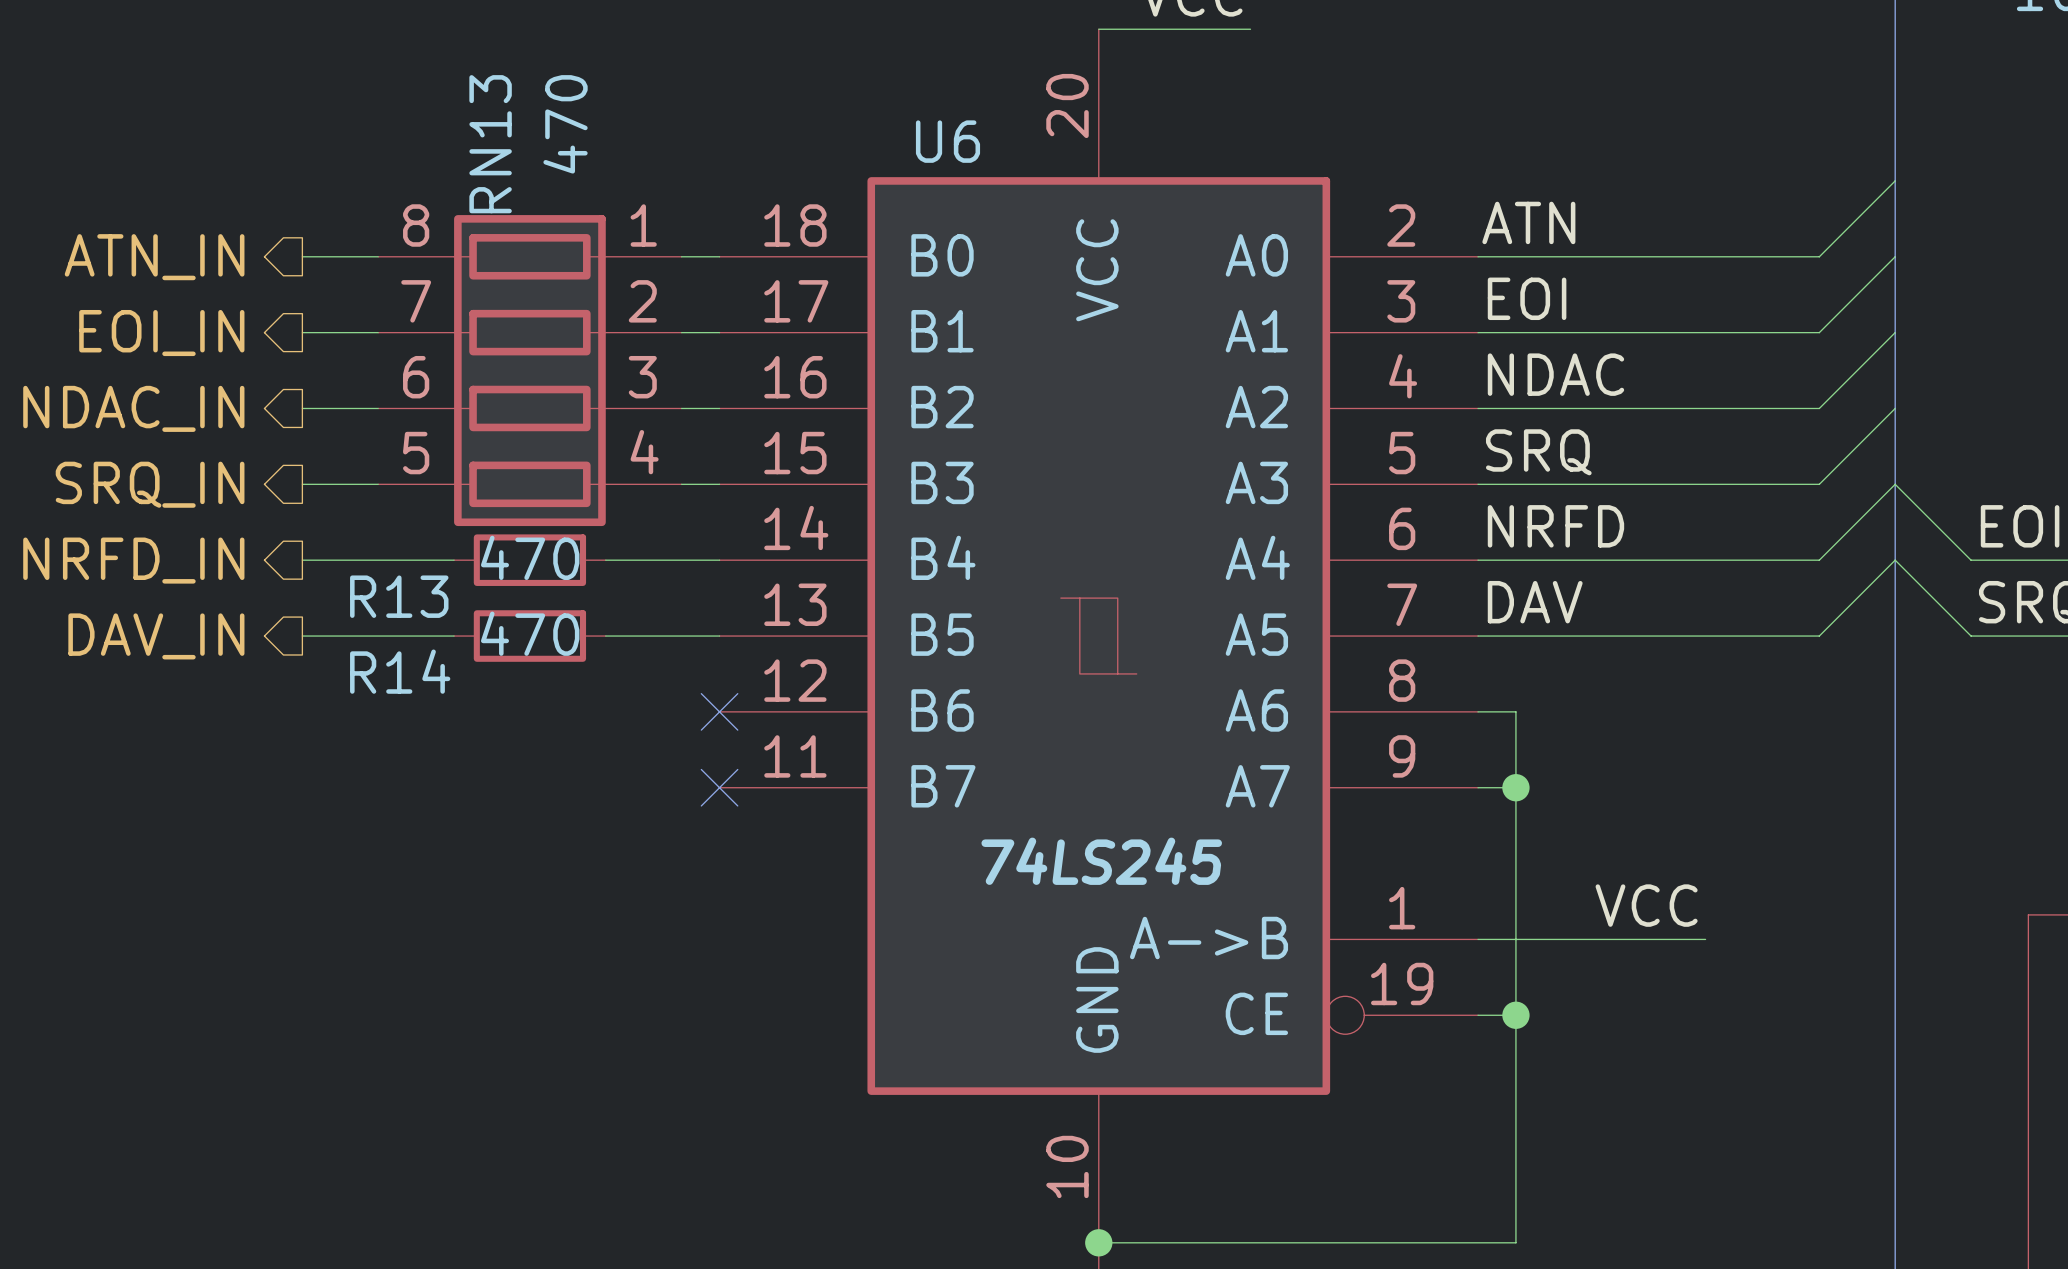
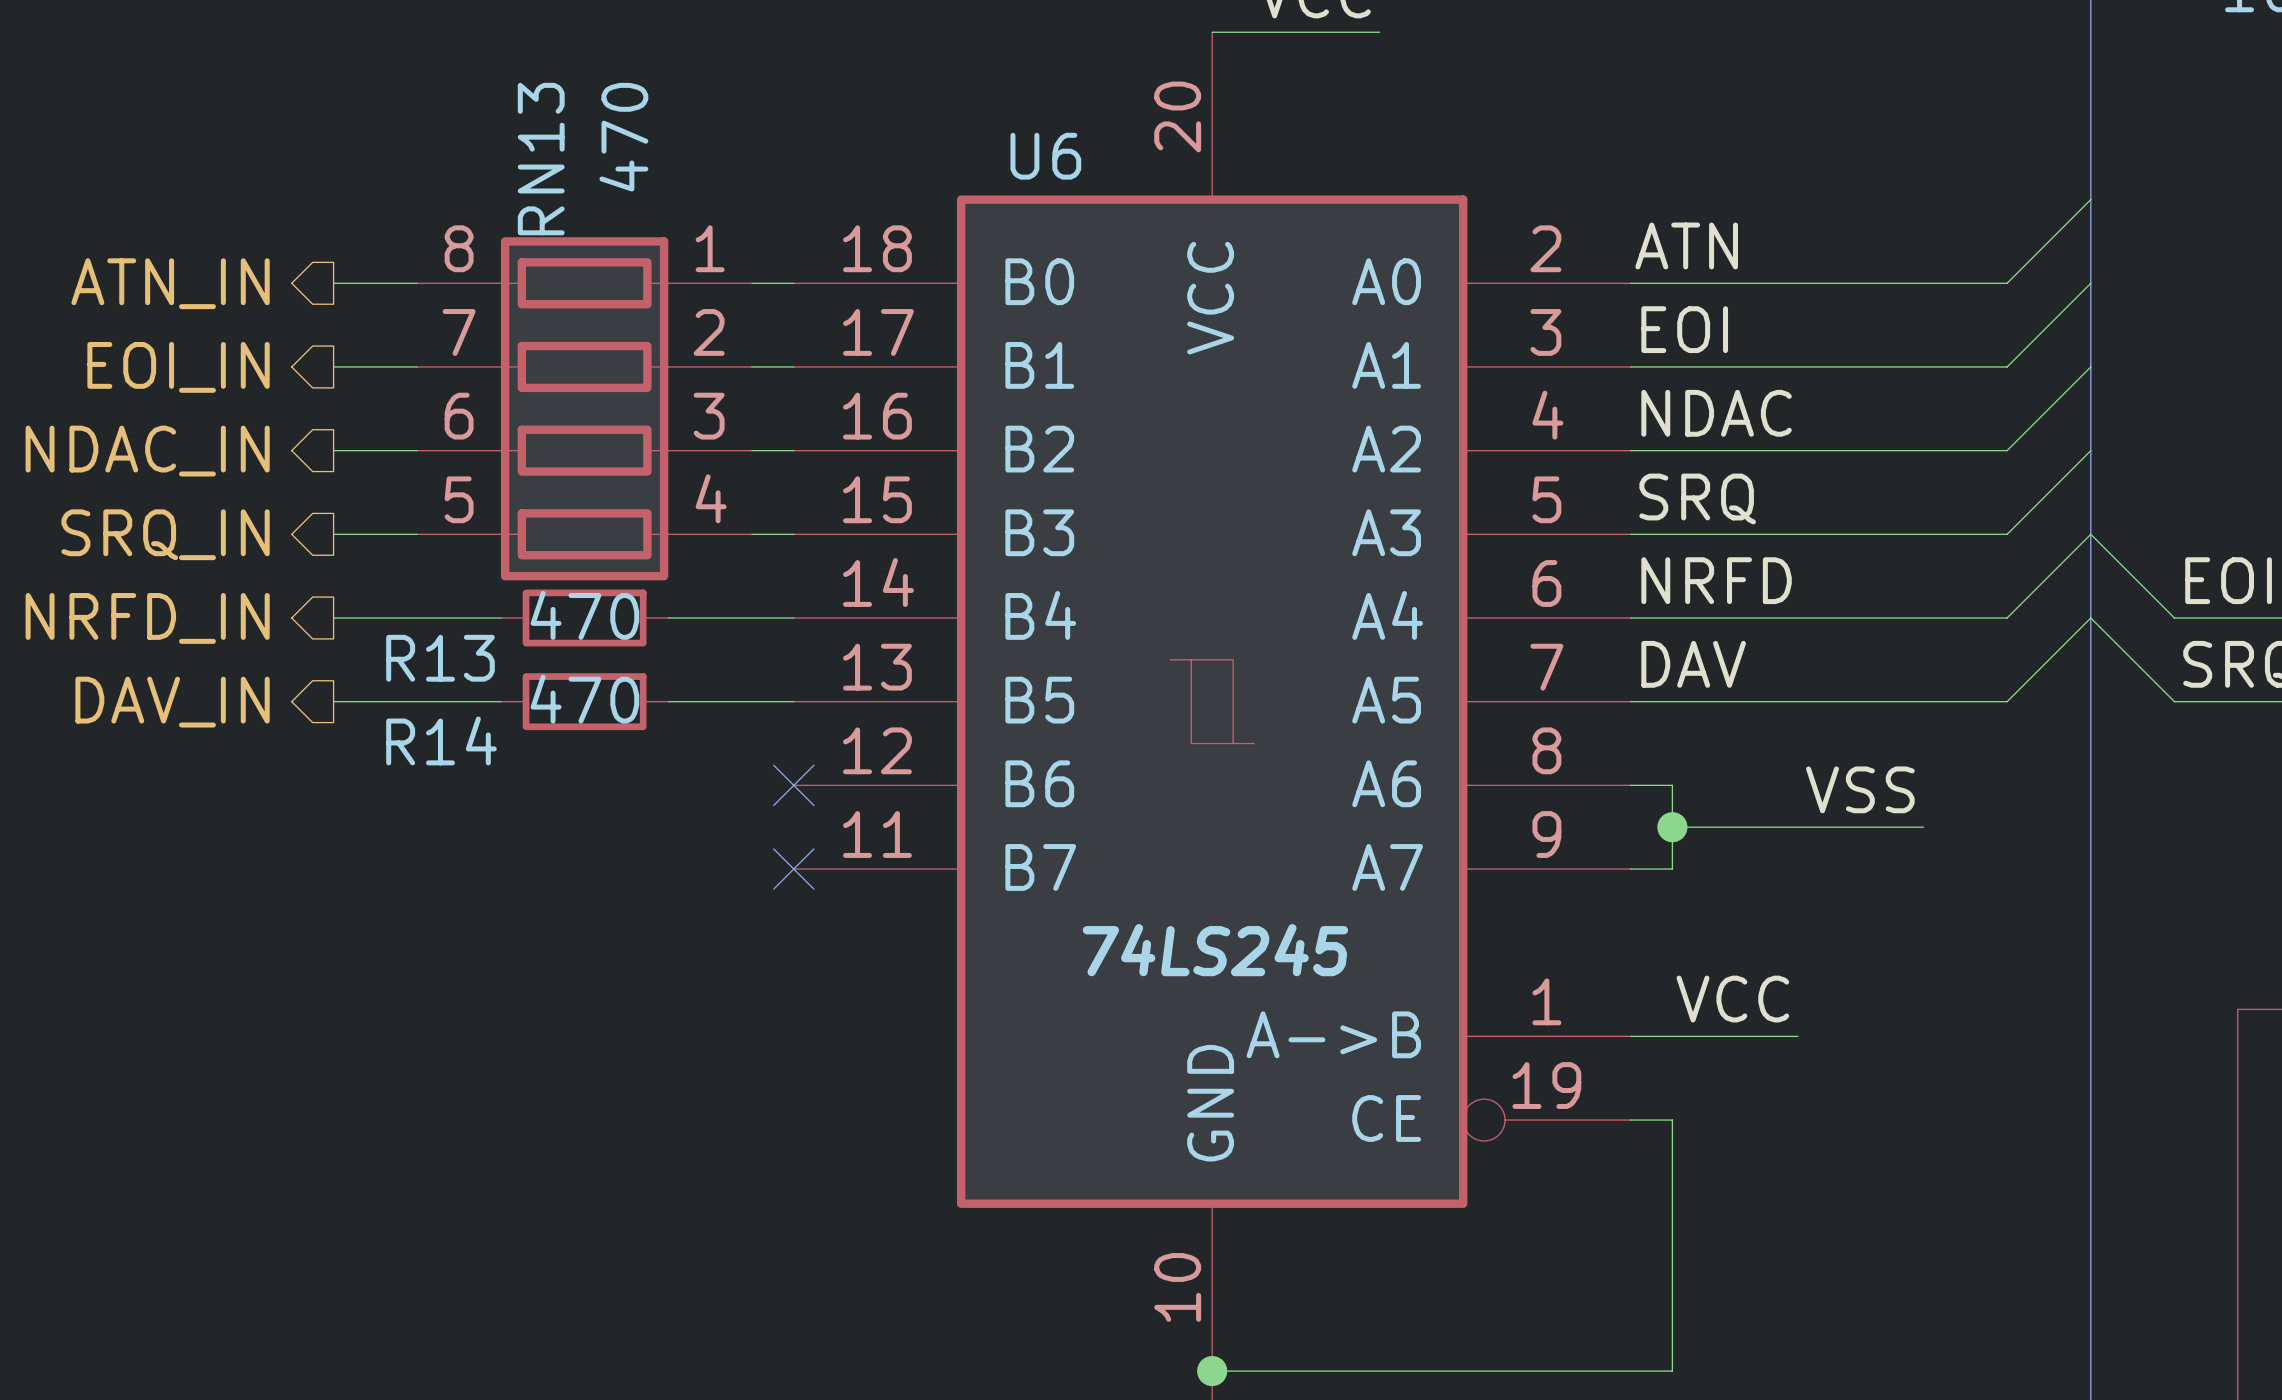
label: none -> VSS (1860, 789)
wire: none -> (1672, 827) (1923, 827)
wire: (1515, 787) (1515, 1015) -> none
junction position: (1515, 787) -> (1672, 827)
label position: VCC (1646, 905) -> VCC (1732, 999)
wire: (1629, 939) (1705, 939) -> none
junction: (1515, 1015) -> none

